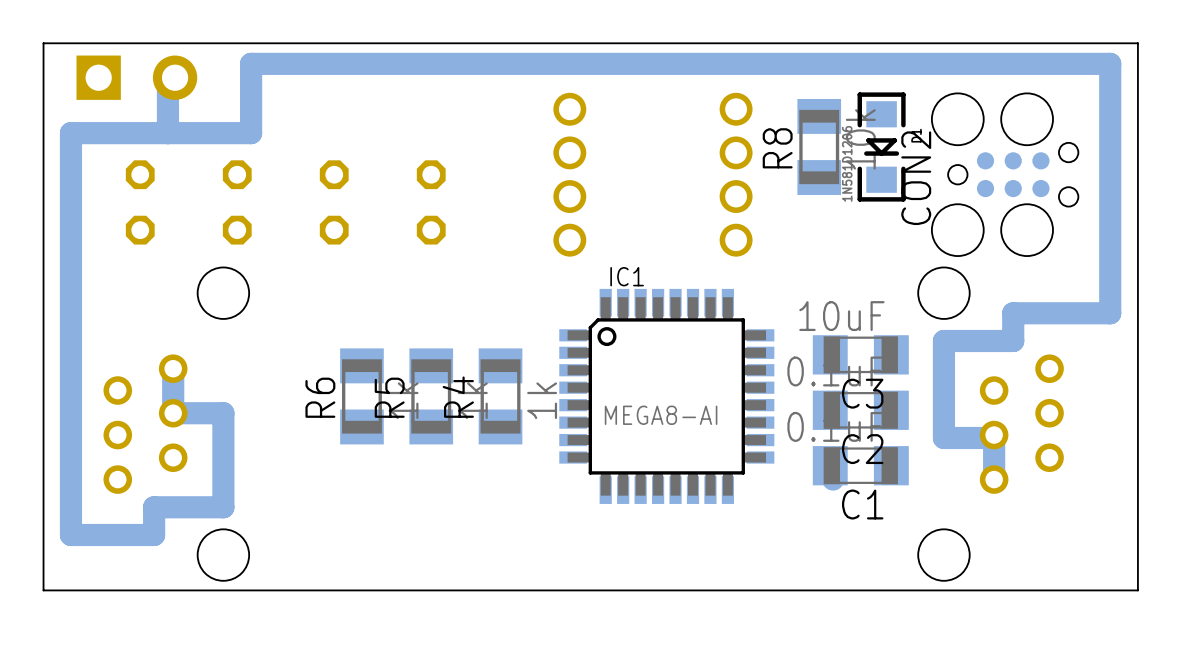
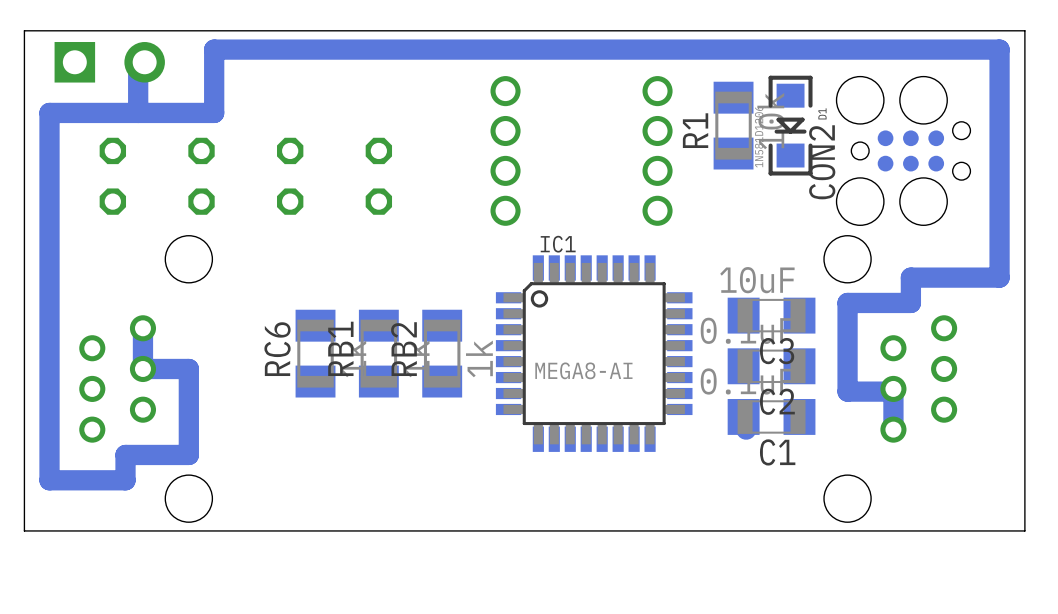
R8 name: R8 (777, 148) -> R1 (695, 130)
R6 name: R6 (320, 397) -> RC6 (277, 349)
R5 name: R5 (389, 397) -> RB1 (340, 348)
R4 name: R4 (458, 397) -> RB2 (403, 349)

